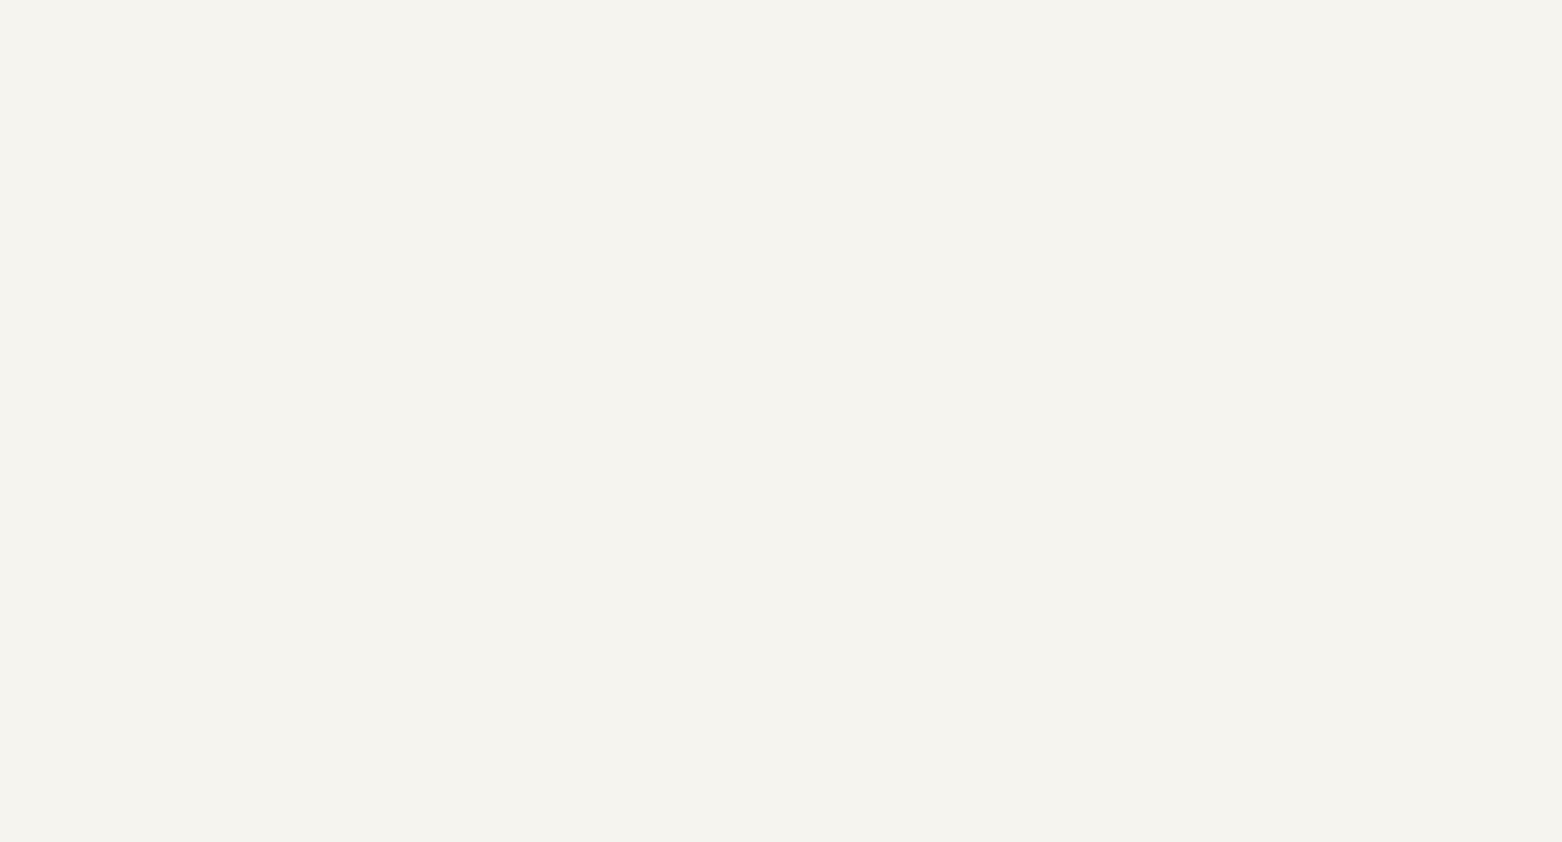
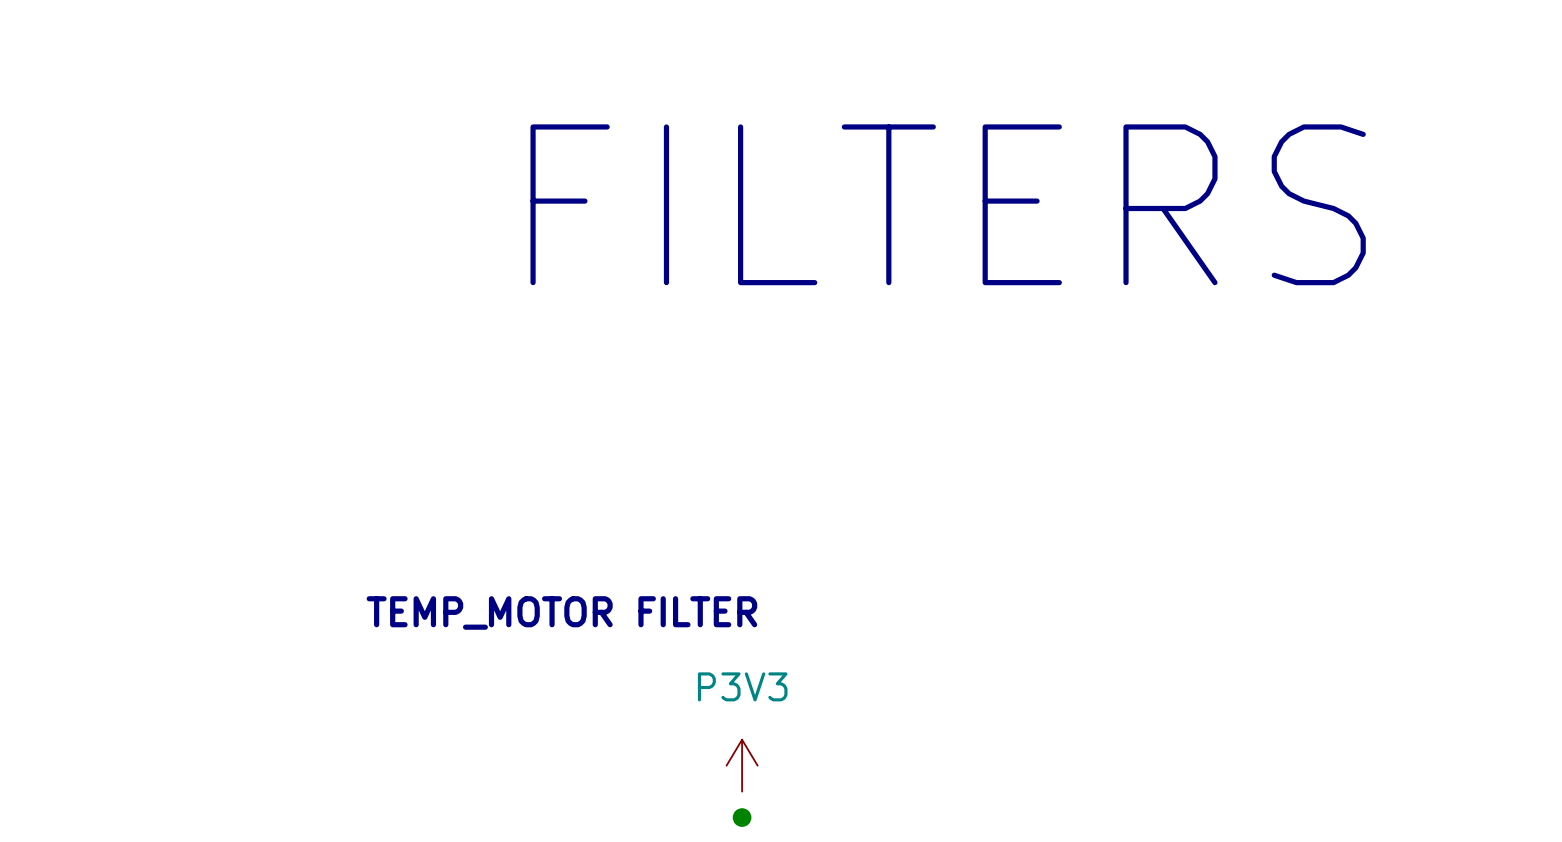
text: none -> FILTERS (948, 204)
text: none -> TEMP_MOTOR FILTER (561, 612)
power symbol: none -> P3V3 (742, 765)
junction: none -> (742, 817)

